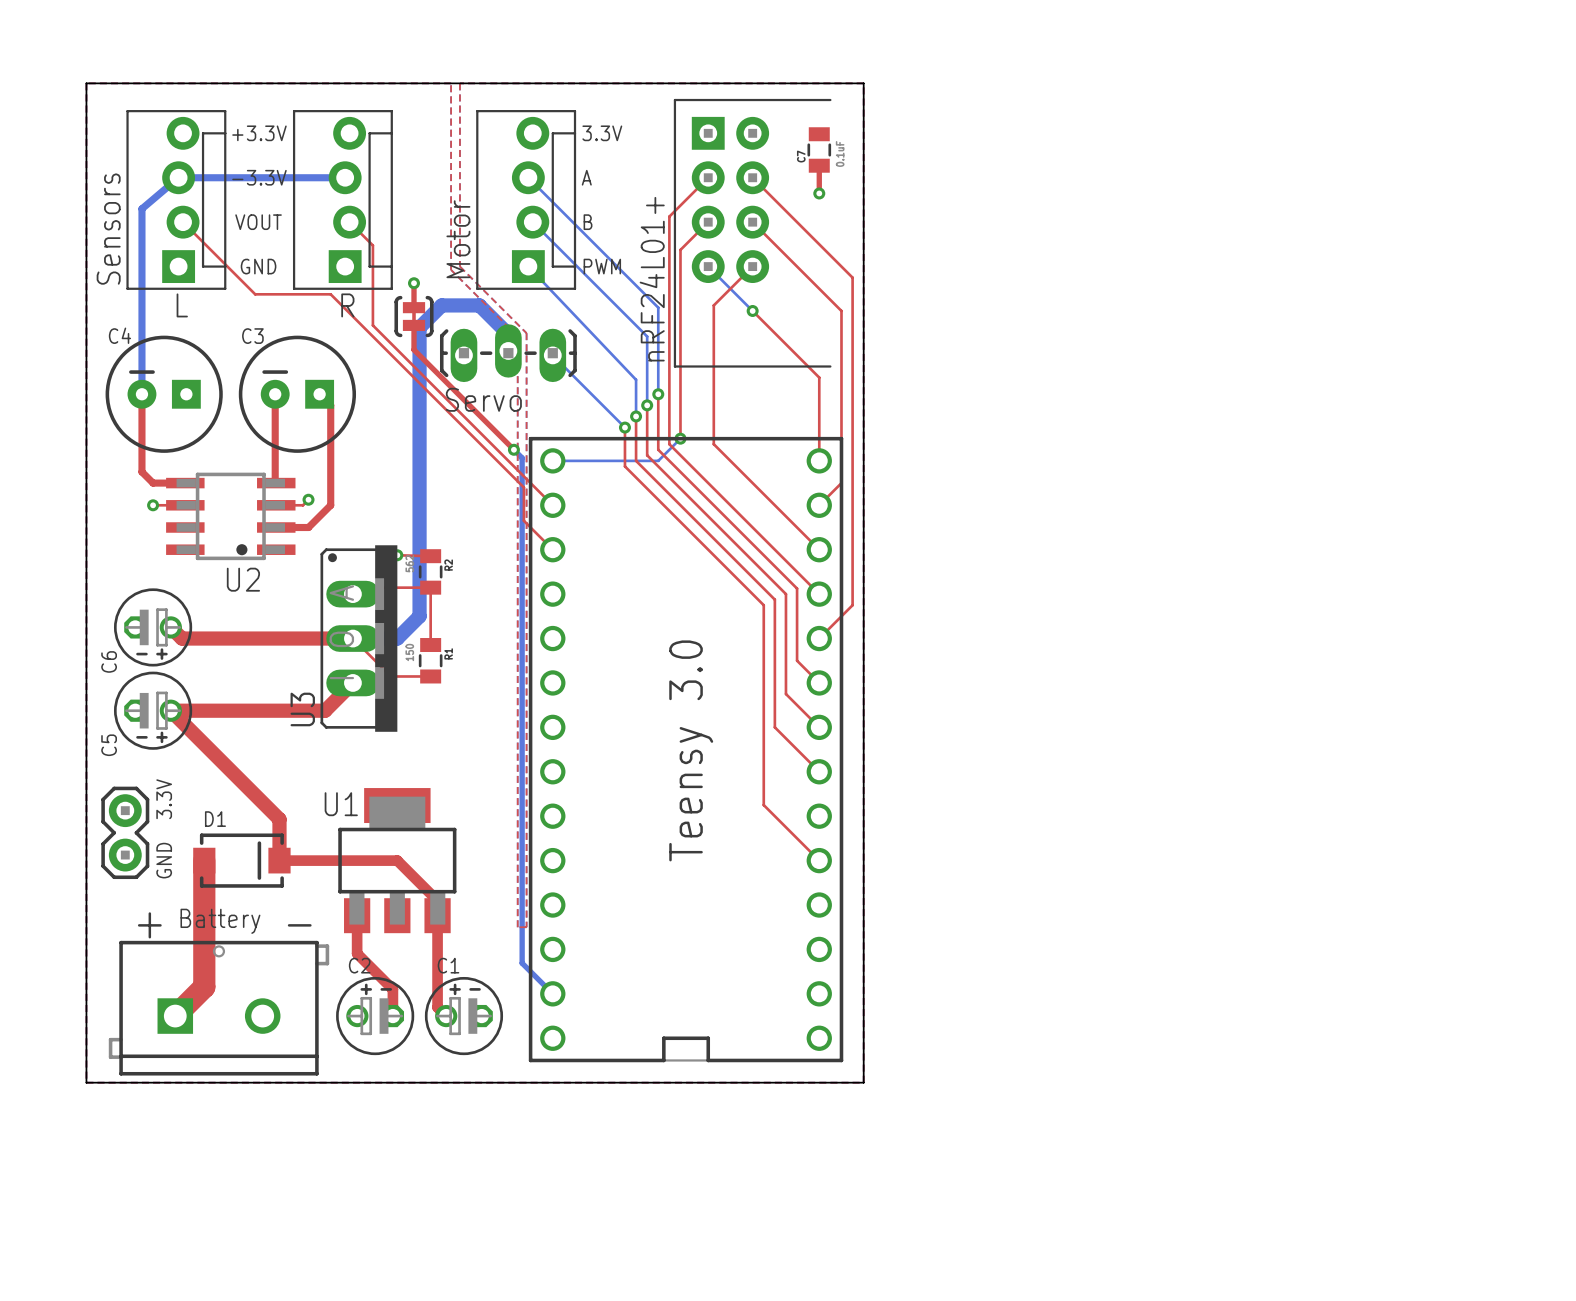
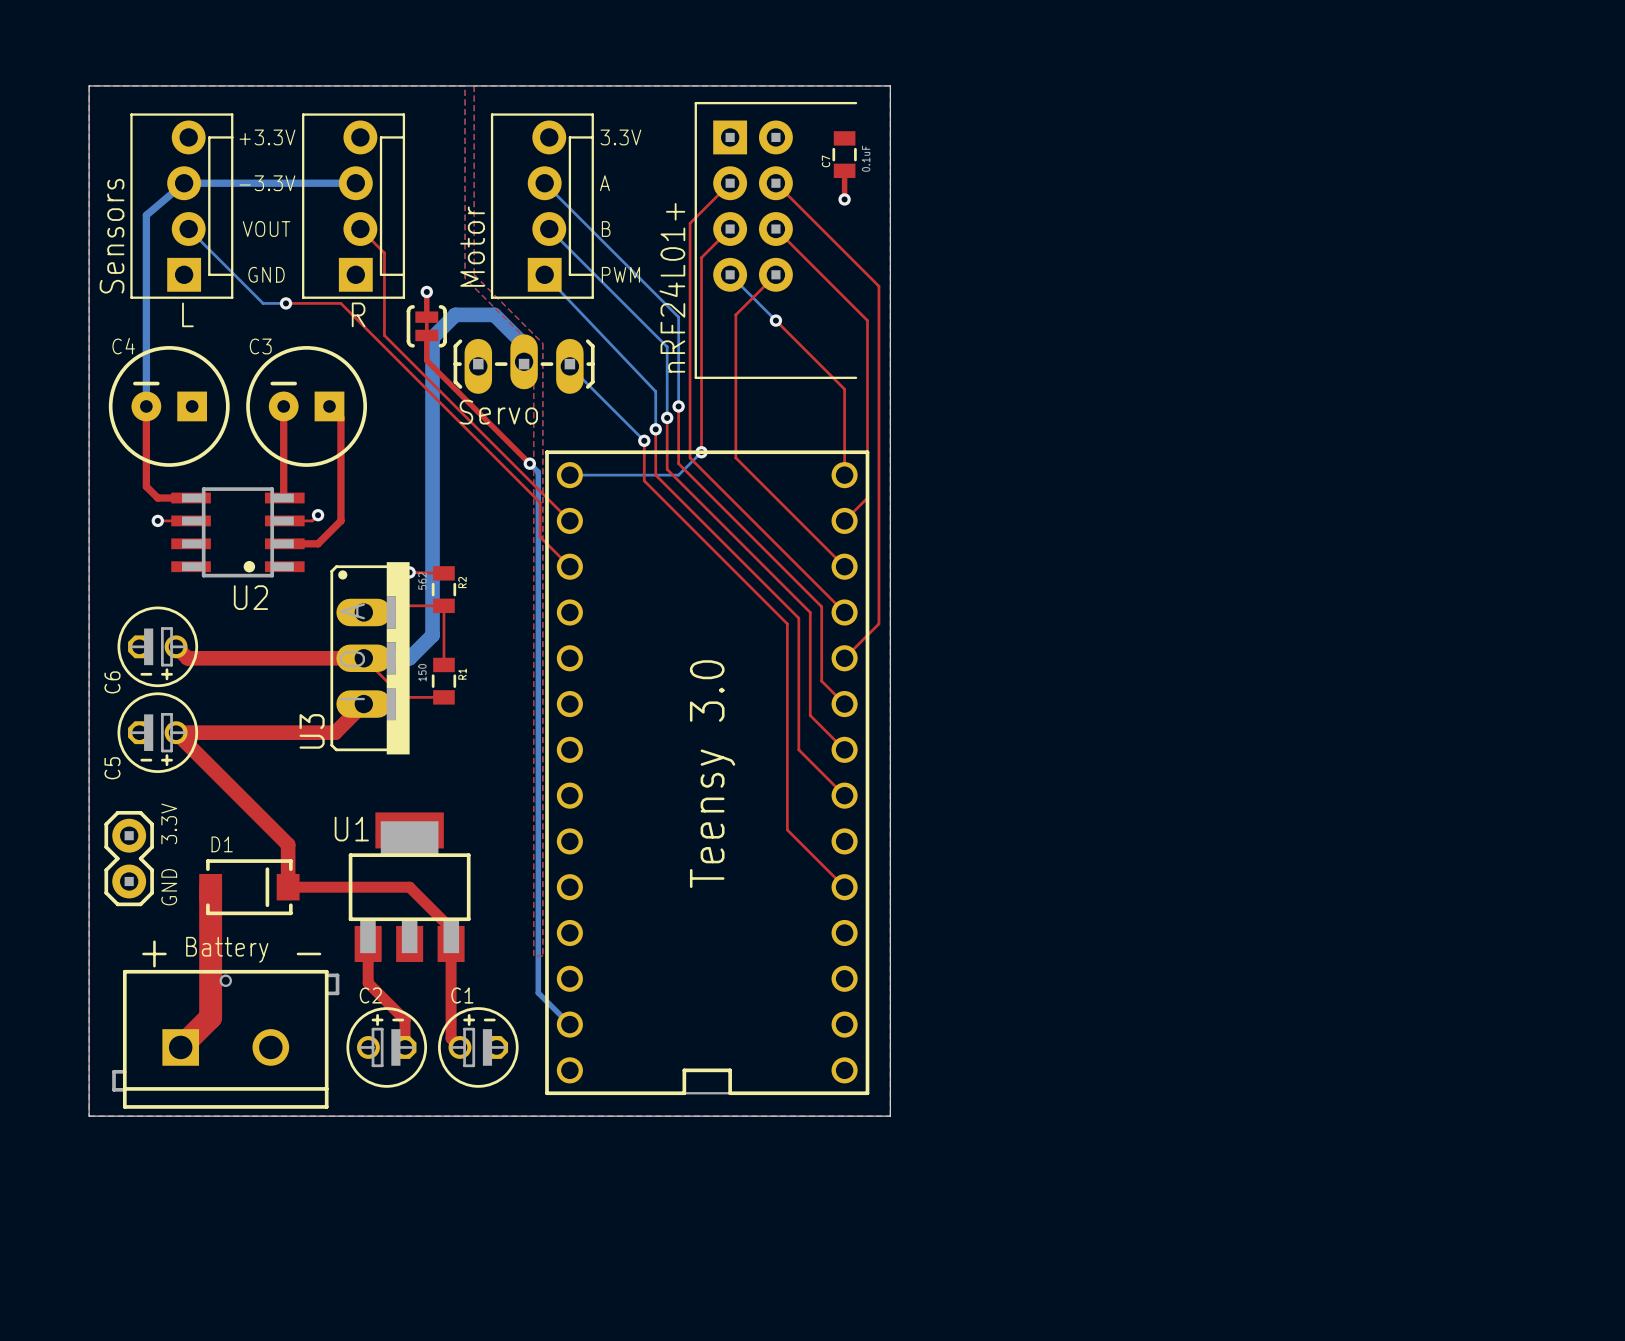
top track: (183, 222) (255, 294) (277, 294) -> none
bottom track: none -> (188, 229) (263, 303) (286, 303)
via: none -> (286, 303)

